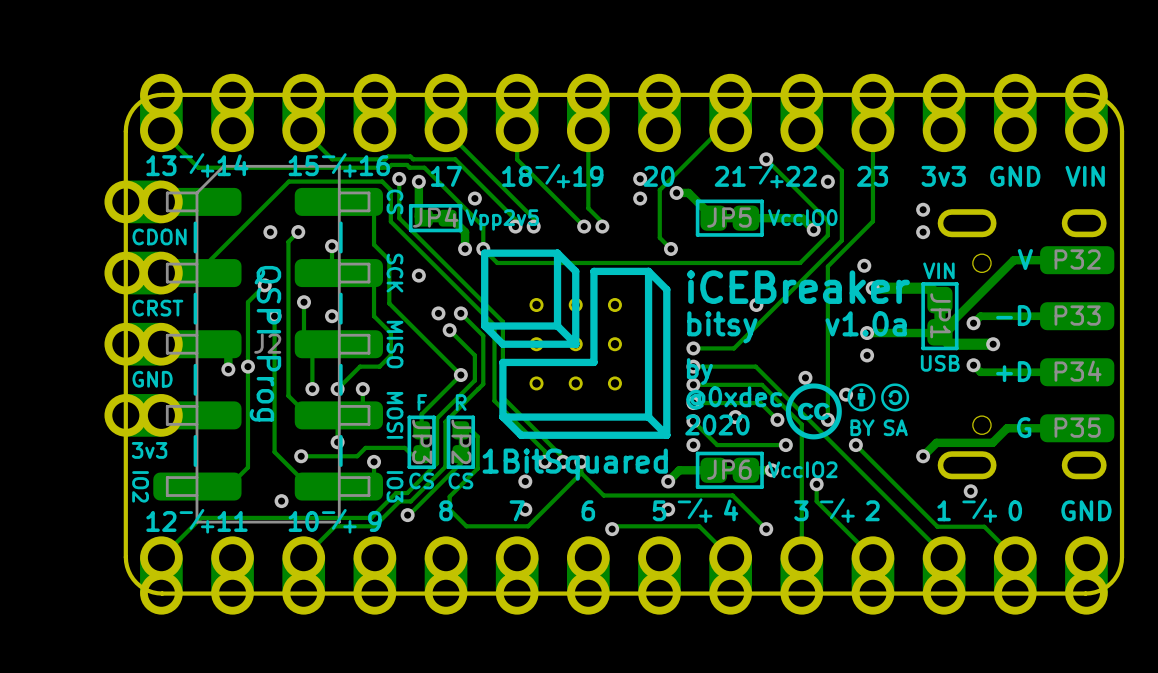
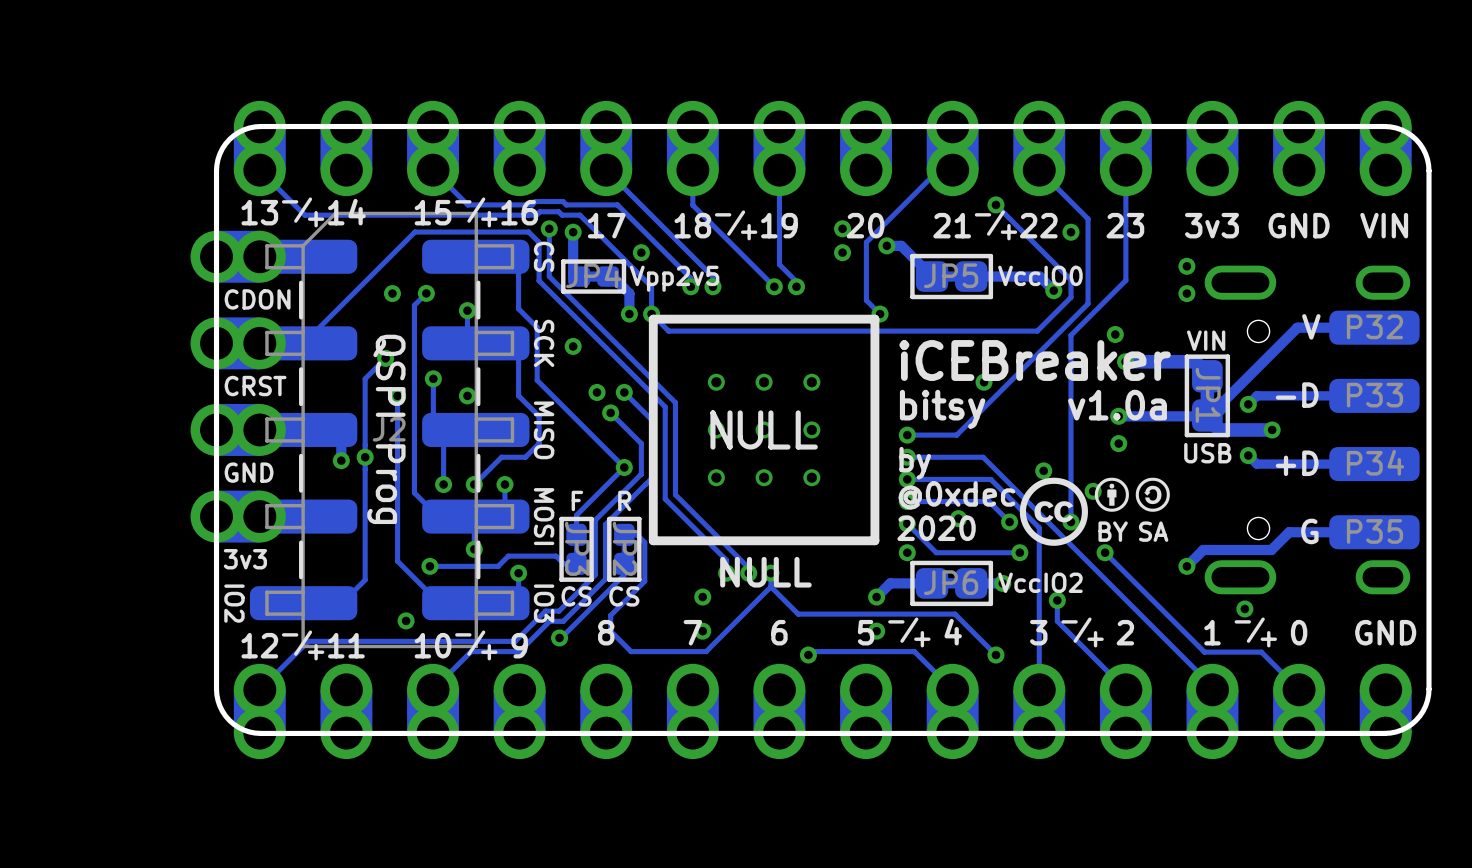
drawing shape: [481, 249, 671, 439] -> [648, 314, 880, 546]
text: 1BitSquared (575, 464) -> NULL (765, 572)

